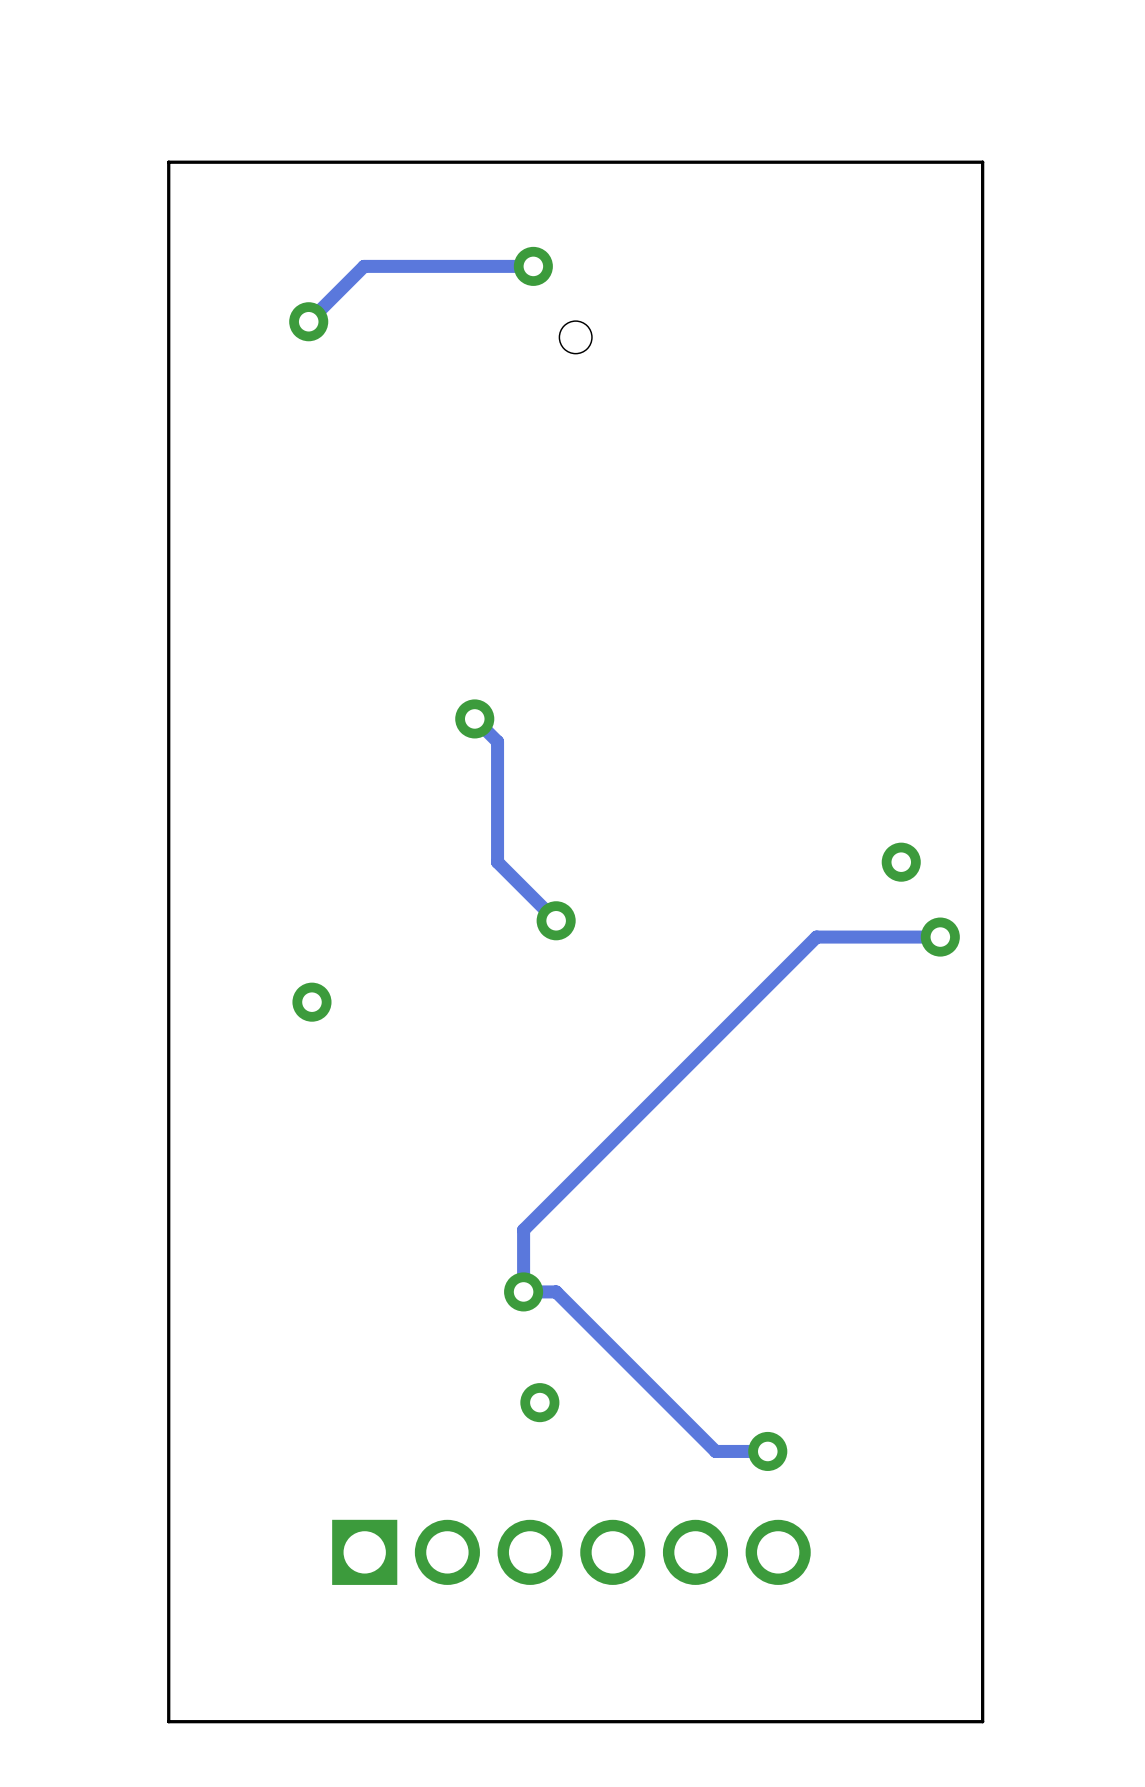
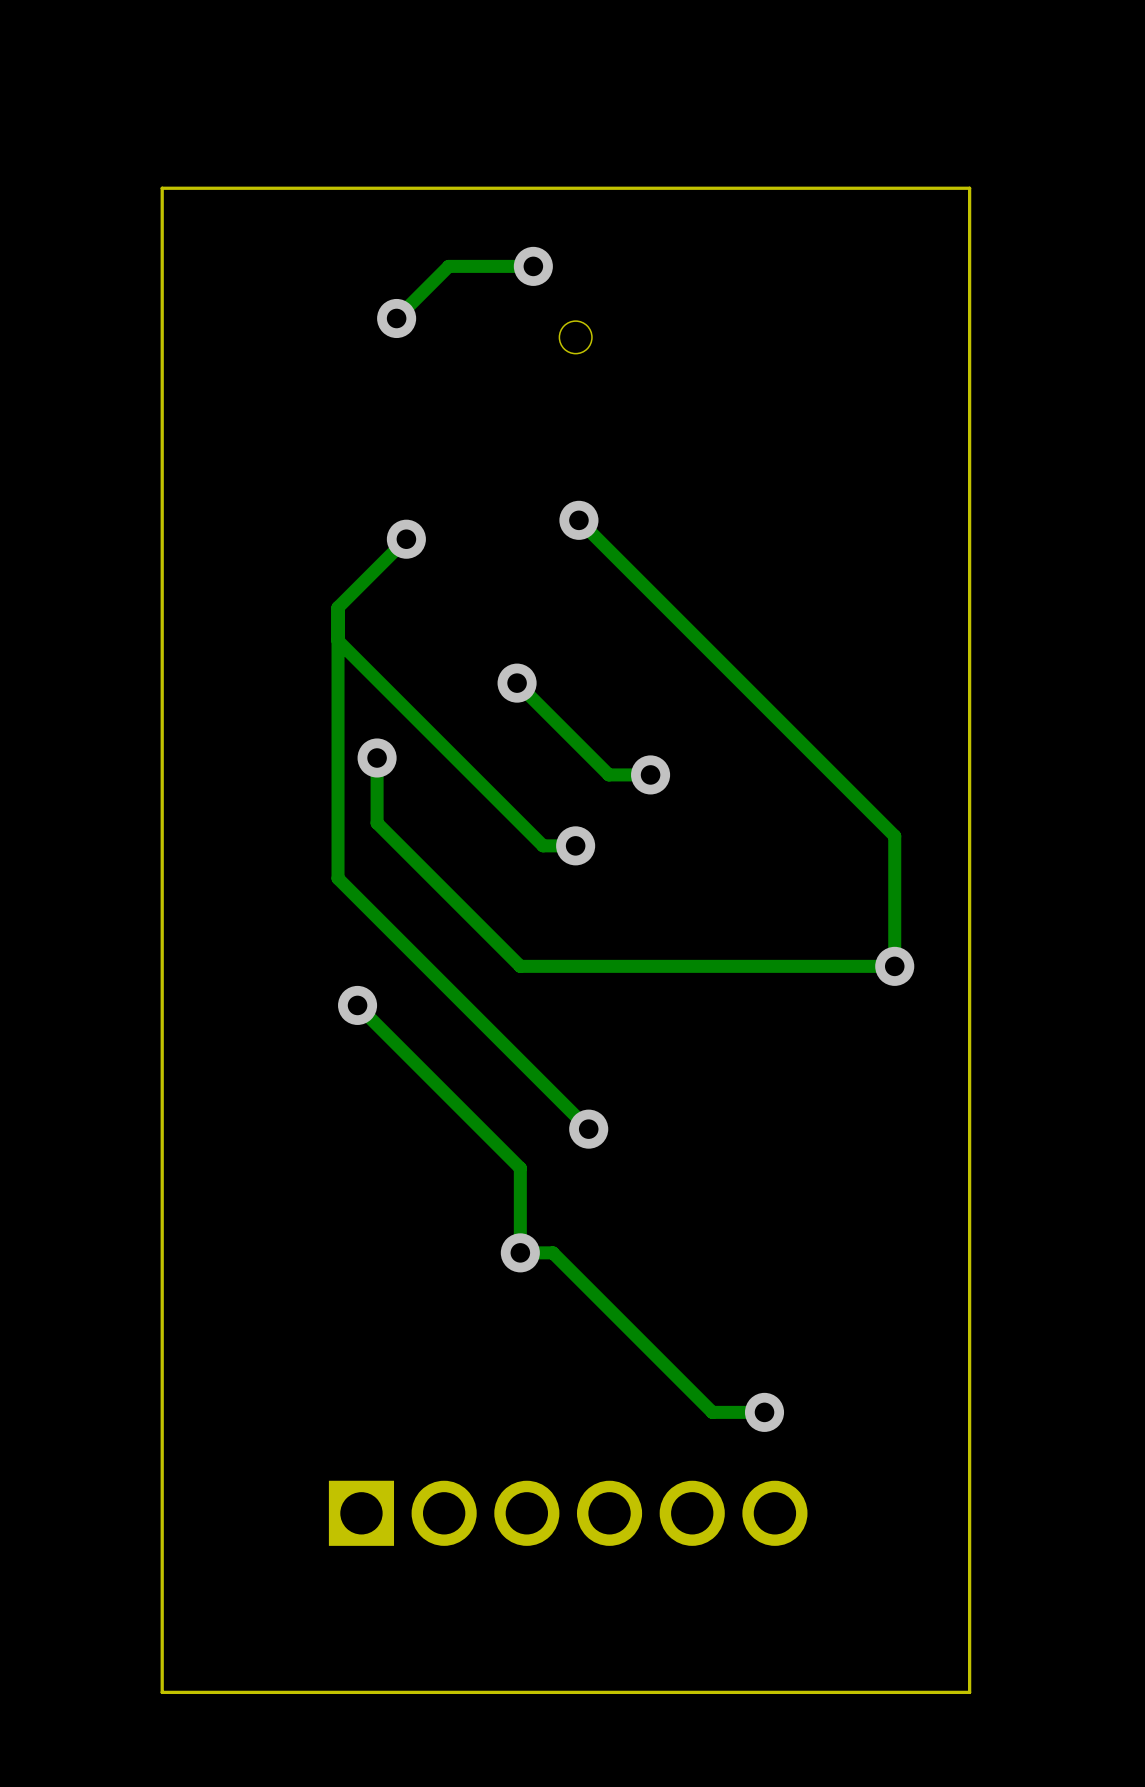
board edge: (982, 162) (982, 1721) (168, 1721) (168, 162) (982, 162) -> (969, 188) (969, 1692) (162, 1692) (162, 188) (969, 188)
track: (448, 266) (364, 266) (308, 321) -> (448, 266) (396, 318)
via position: (308, 321) -> (396, 318)
track: none -> (578, 520) (894, 836) (894, 966) (520, 966) (377, 823) (377, 758)
via: none -> (578, 520)
track: none -> (406, 539) (338, 607) (338, 878) (588, 1129)
via: none -> (406, 539)
track: none -> (338, 640) (543, 845) (575, 845)
track: none -> (517, 683) (608, 774) (650, 774)
via: none -> (517, 683)
track: (474, 718) (497, 741) (497, 862) (556, 920) -> none
via: (474, 718) -> none
via: none -> (377, 758)
via: none -> (650, 774)
via: (901, 862) -> none
via position: (556, 920) -> (575, 845)
track: (940, 937) (816, 937) (523, 1230) (523, 1291) (556, 1291) (715, 1451) (767, 1451) -> none
via: (940, 937) -> none
via: none -> (894, 966)
via position: (311, 1002) -> (357, 1005)
track: none -> (357, 1005) (520, 1168) (520, 1252) (552, 1252) (712, 1412) (764, 1412)
via: none -> (588, 1129)
via position: (523, 1291) -> (520, 1252)
via: (539, 1402) -> none
via position: (767, 1451) -> (764, 1412)
part position: (571, 1552) -> (568, 1513)

